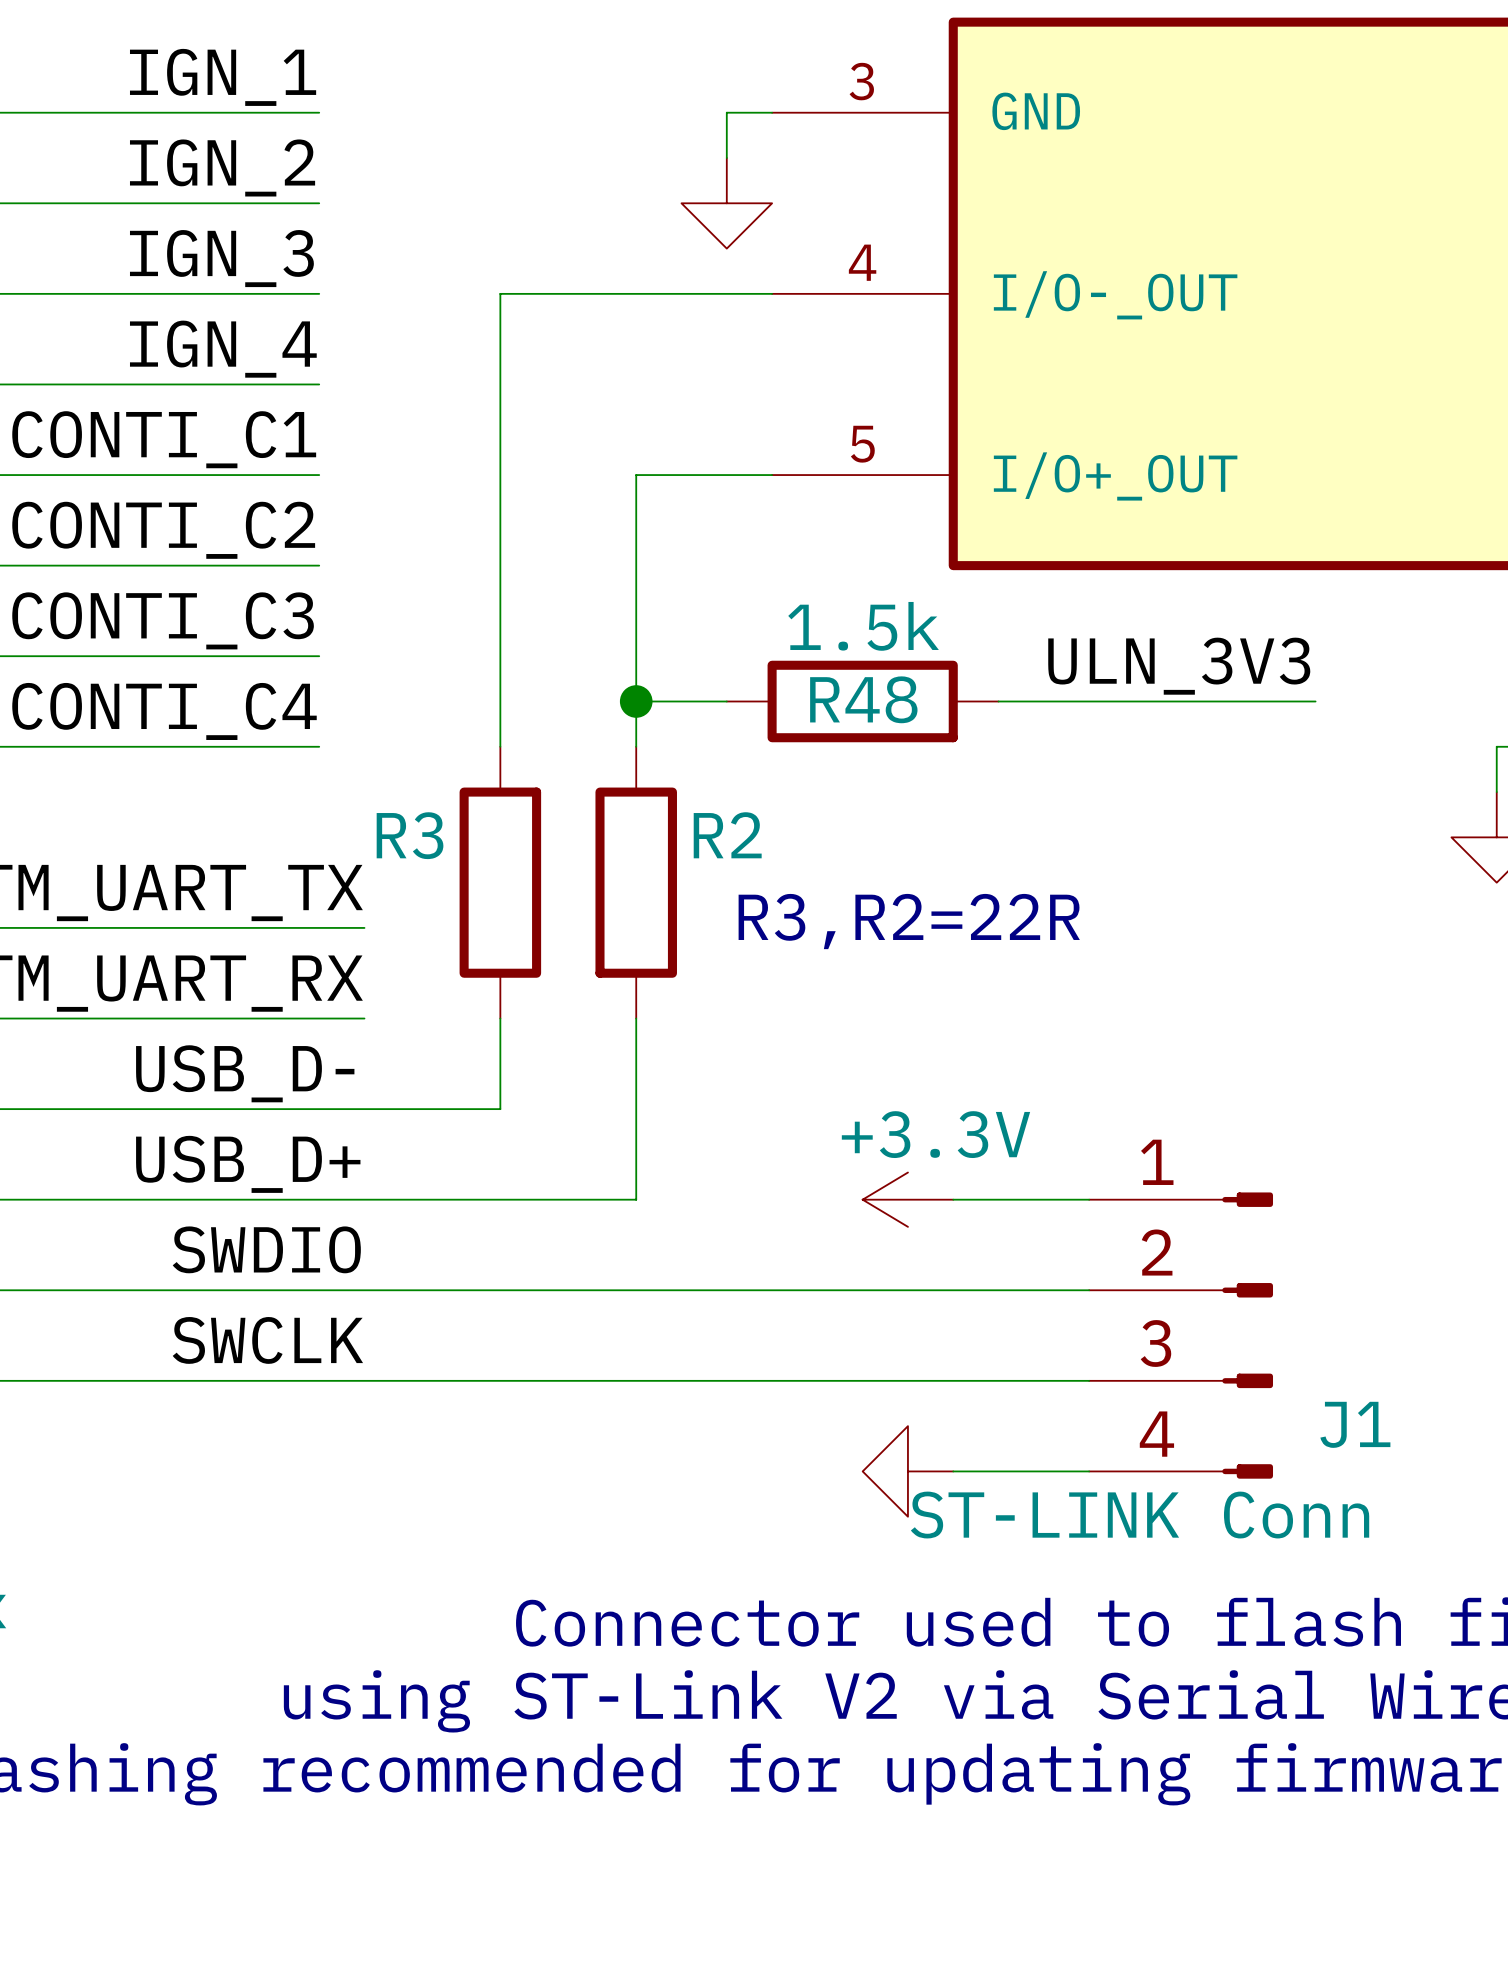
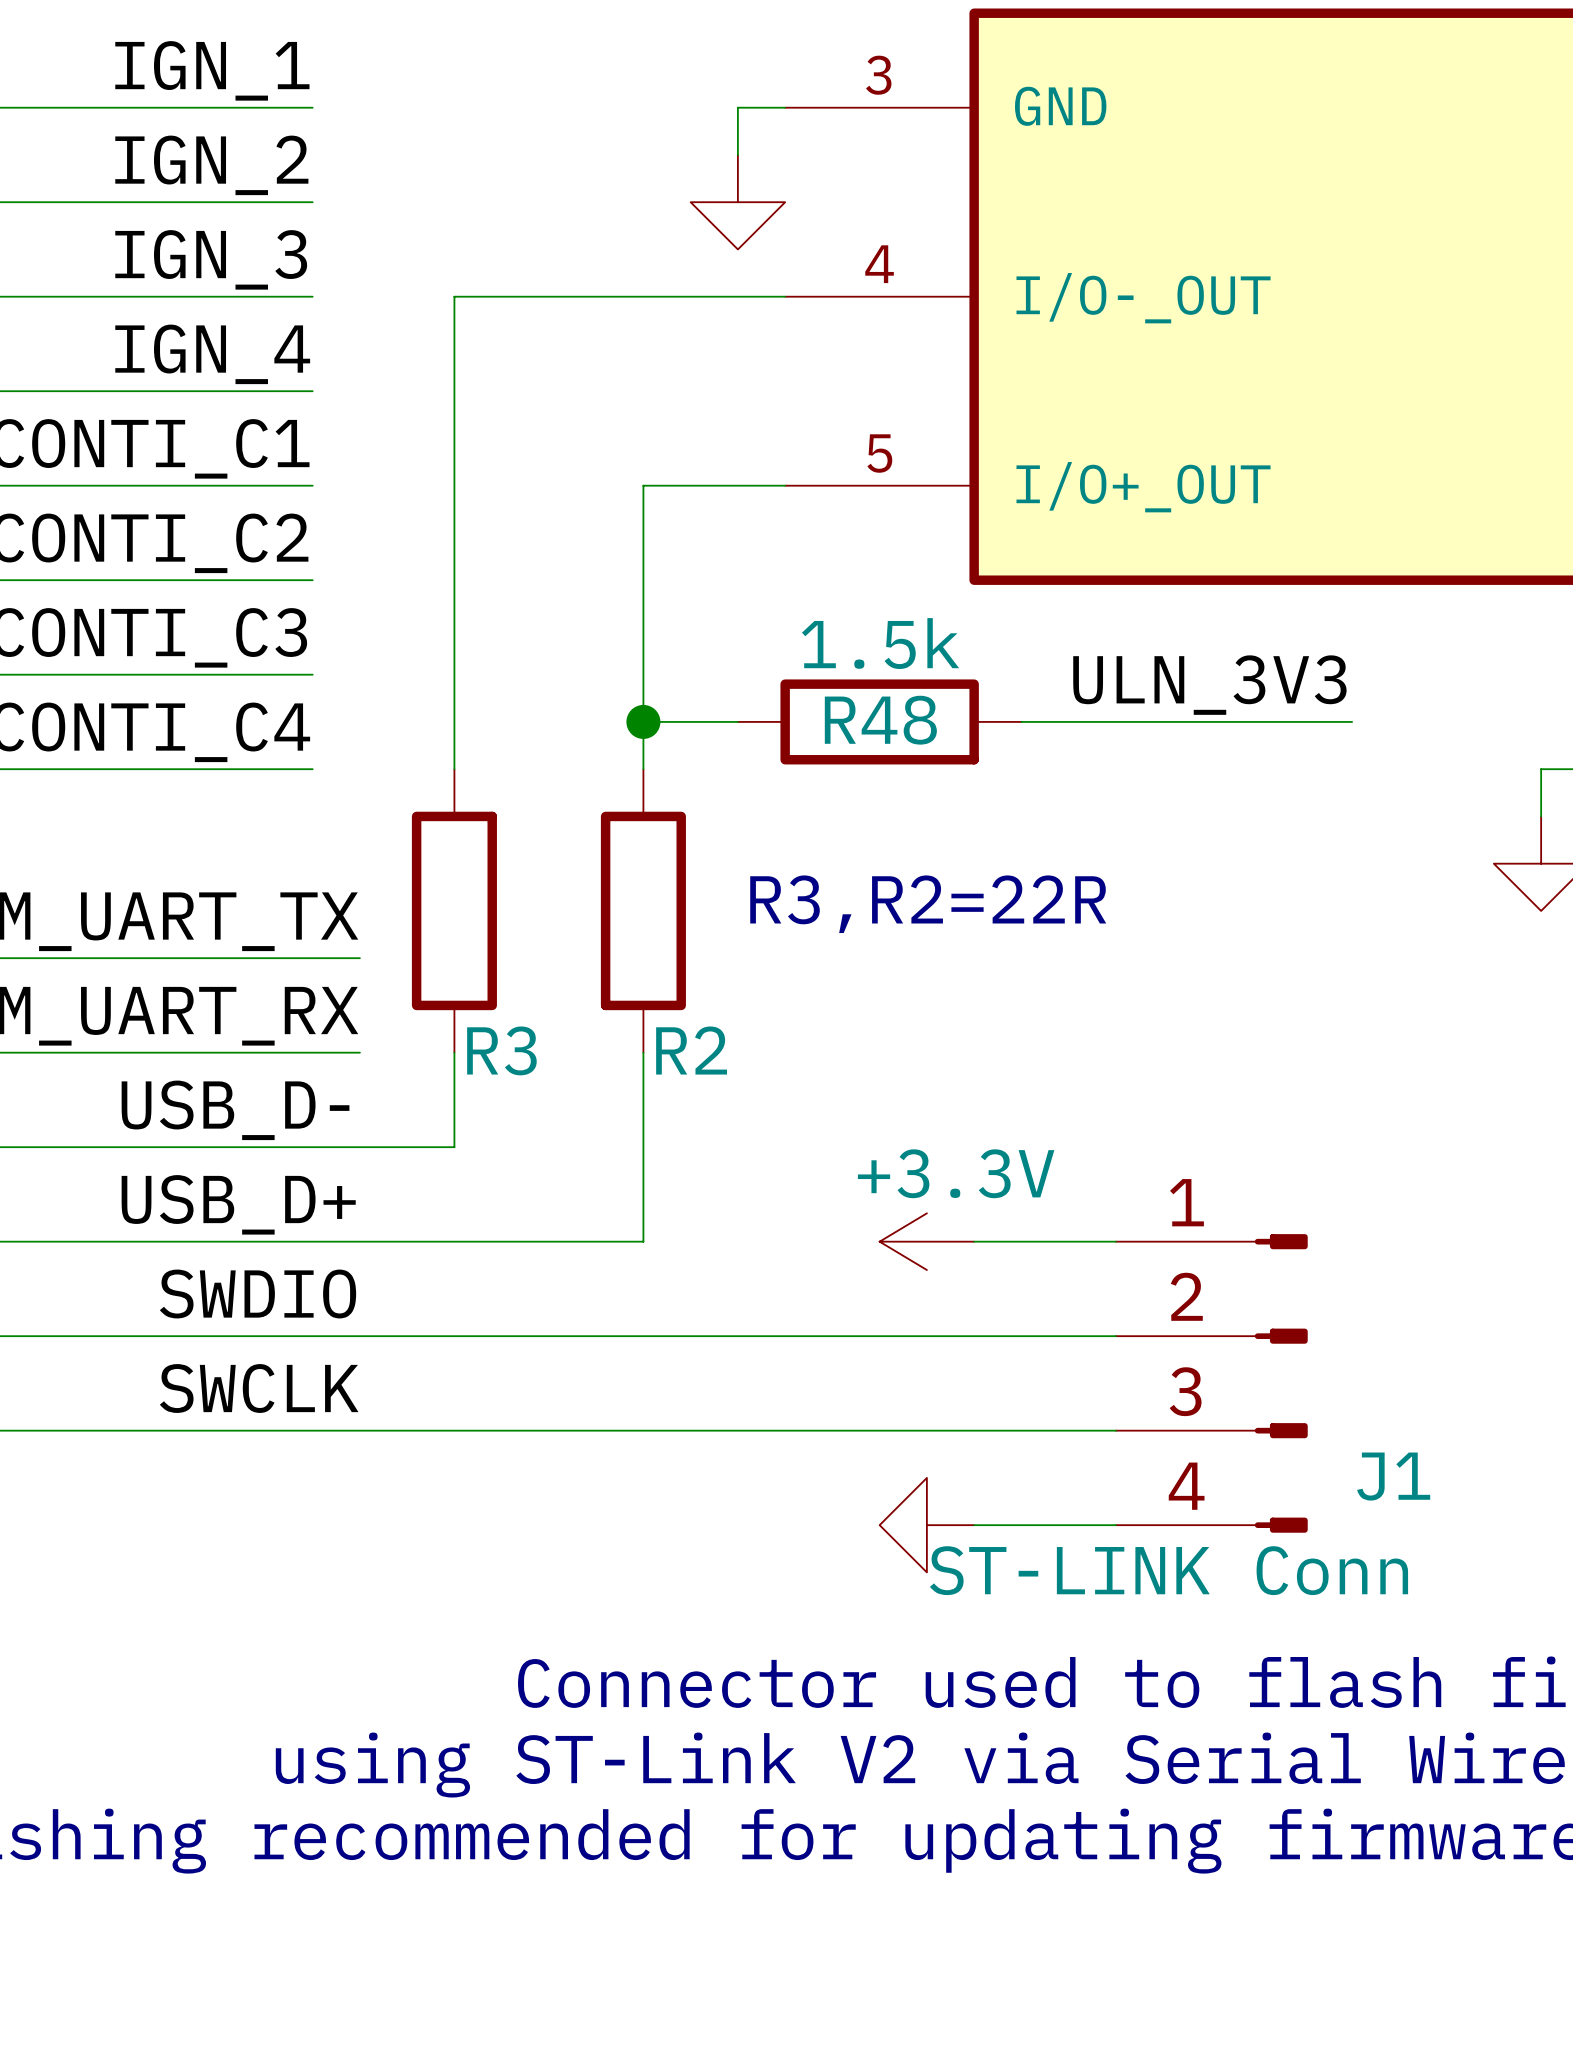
wire: (500, 293) (500, 746) -> (501, 296) (454, 296) (454, 769)
R3 name position: R3 (410, 835) -> R3 (501, 1050)
R2 name position: R2 (727, 835) -> R2 (691, 1050)
R3 position: (500, 882) -> (454, 910)
text position: R3,R2=22R (909, 921) -> R3,R2=22R (928, 904)
wire: (500, 1018) (500, 1109) (455, 1109) -> (454, 1052) (454, 1147)

